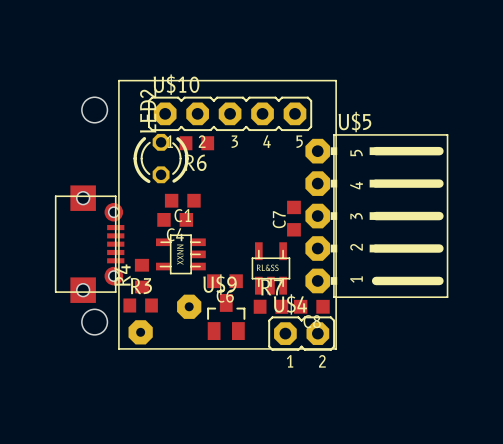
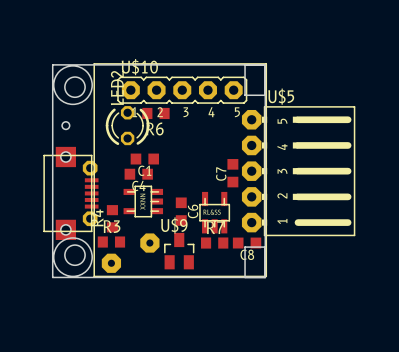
board edge: none -> (265, 64) (52, 64) (52, 277) (265, 277)
board edge: none -> (265, 64) (265, 277)
board edge: none -> (265, 64) (265, 95) (245, 95) (245, 64) (265, 64)
round board edge: none -> [53, 65, 93, 105]
part: none -> (65, 125)
part footprint: [54, 185, 125, 303] -> [43, 146, 99, 240]
C6 rotation: 0° (224, 281) -> 90° clockwise (181, 211)
round board edge: none -> [53, 237, 93, 277]
U$4: (301, 333) -> none
board edge: none -> (265, 277) (265, 247) (245, 247) (245, 277) (265, 277)

